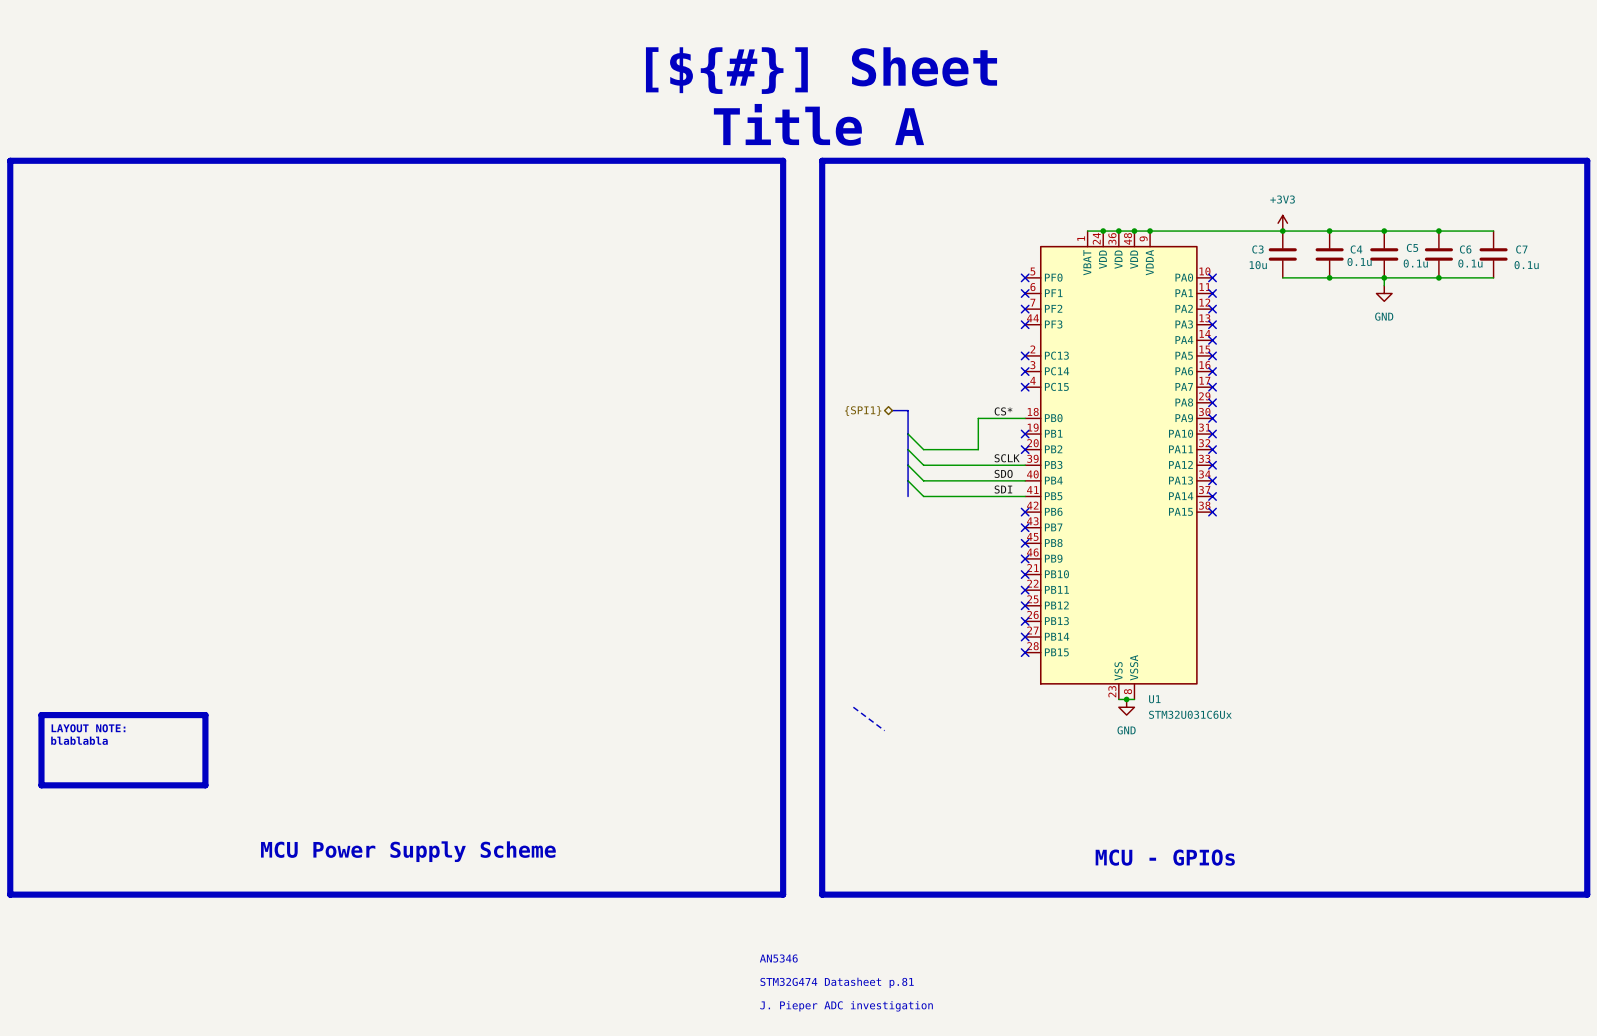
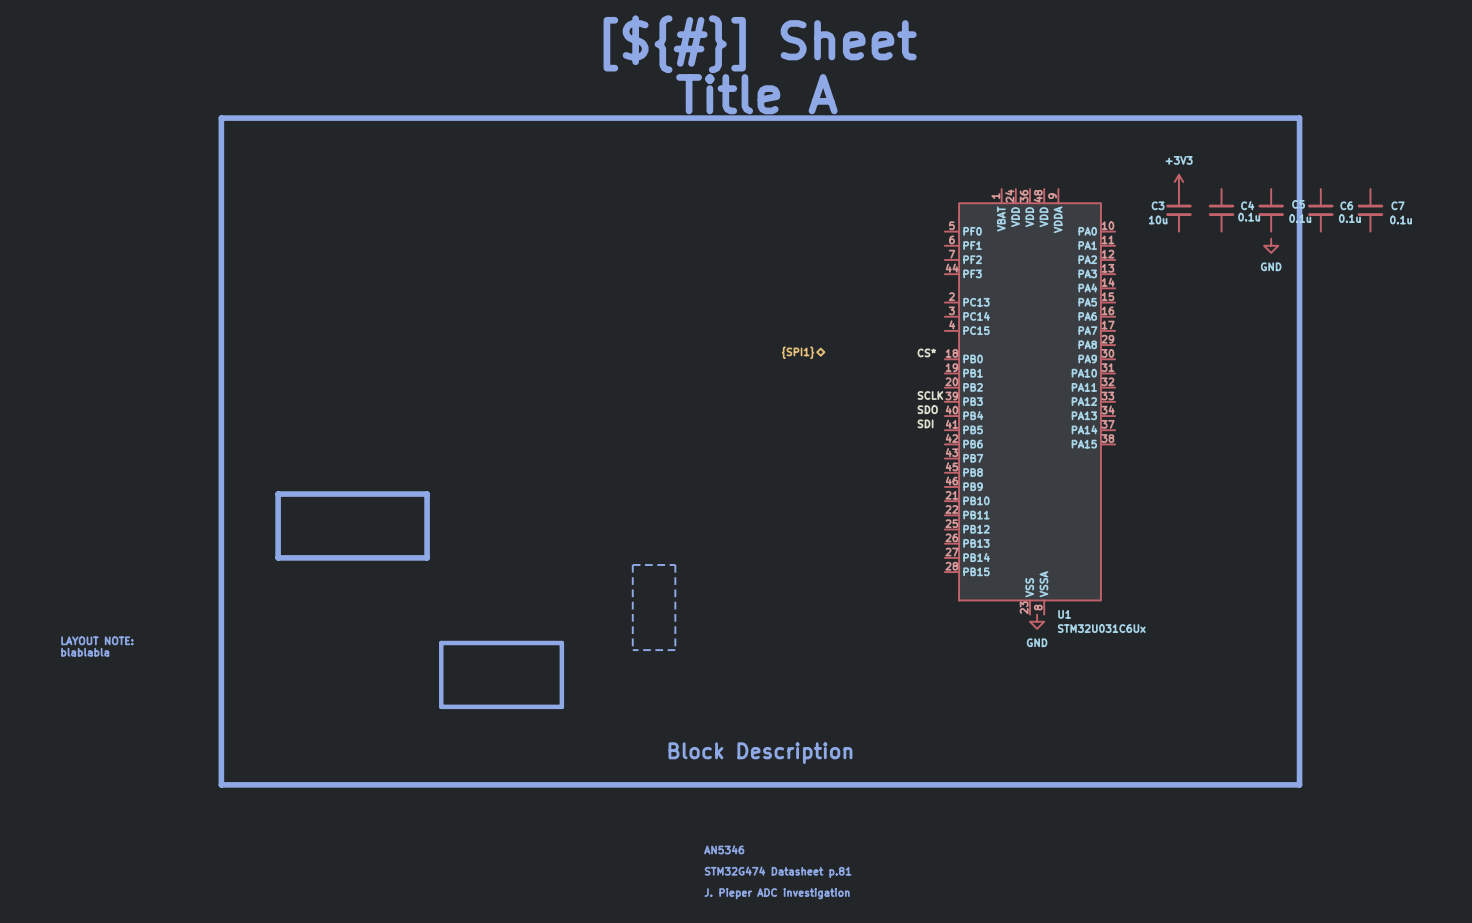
line: none -> (221, 118) (1299, 118) (1299, 784) (221, 784) (221, 118)
line: (10, 160) (783, 160) (783, 894) (10, 894) (10, 160) -> none
line: (822, 160) (1587, 160) (1587, 894) (822, 894) (822, 160) -> none
wire: (1087, 231) (1493, 231) -> none
junction: (1103, 231) -> none
junction: (1118, 231) -> none
junction: (1134, 231) -> none
junction: (1150, 231) -> none
junction: (1282, 231) -> none
junction: (1329, 231) -> none
junction: (1384, 231) -> none
junction: (1438, 231) -> none
no-connect mark: (1025, 277) -> none
no-connect mark: (1212, 277) -> none
wire: (1282, 277) (1493, 277) -> none
junction: (1329, 277) -> none
wire: (1384, 277) (1384, 285) -> none
junction: (1384, 277) -> none
junction: (1438, 277) -> none
no-connect mark: (1025, 293) -> none
no-connect mark: (1212, 293) -> none
no-connect mark: (1025, 309) -> none
no-connect mark: (1212, 309) -> none
no-connect mark: (1025, 324) -> none
no-connect mark: (1212, 324) -> none
no-connect mark: (1212, 340) -> none
no-connect mark: (1025, 355) -> none
no-connect mark: (1212, 355) -> none
no-connect mark: (1025, 371) -> none
no-connect mark: (1212, 371) -> none
no-connect mark: (1025, 387) -> none
no-connect mark: (1212, 387) -> none
no-connect mark: (1212, 402) -> none
bus: (892, 410) (908, 410) (908, 496) -> none
wire: (1025, 418) (978, 418) (978, 449) (923, 449) (908, 434) -> none
no-connect mark: (1212, 418) -> none
no-connect mark: (1025, 434) -> none
no-connect mark: (1212, 434) -> none
wire: (908, 449) (923, 465) (1025, 465) -> none
no-connect mark: (1025, 449) -> none
no-connect mark: (1212, 449) -> none
wire: (908, 465) (923, 480) (1025, 480) -> none
no-connect mark: (1212, 465) -> none
wire: (908, 480) (923, 496) (1025, 496) -> none
no-connect mark: (1212, 480) -> none
no-connect mark: (1212, 496) -> none
no-connect mark: (1025, 512) -> none
no-connect mark: (1212, 512) -> none
no-connect mark: (1025, 527) -> none
no-connect mark: (1025, 543) -> none
no-connect mark: (1025, 558) -> none
line: none -> (278, 494) (427, 494) (427, 557) (278, 557) (278, 494)
no-connect mark: (1025, 574) -> none
no-connect mark: (1025, 590) -> none
no-connect mark: (1025, 605) -> none
no-connect mark: (1025, 621) -> none
no-connect mark: (1025, 637) -> none
line: none -> (632, 564) (675, 564) (675, 650) (632, 650) (632, 564)
no-connect mark: (1025, 652) -> none
wire: (1118, 699) (1134, 699) -> none
junction: (1126, 699) -> none
line: (853, 707) (884, 730) -> none
line: (41, 715) (205, 715) (205, 785) (41, 785) (41, 715) -> none
line: none -> (441, 643) (441, 706) (561, 706) (561, 643) (441, 643)
text: none -> Block Description (760, 753)
text: MCU Power Supply Scheme (408, 851) -> none
text: MCU - GPIOs (1165, 857) -> none

